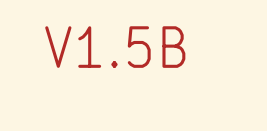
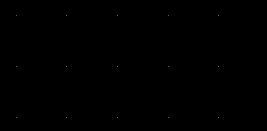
text: V1.5B (115, 47) -> none

